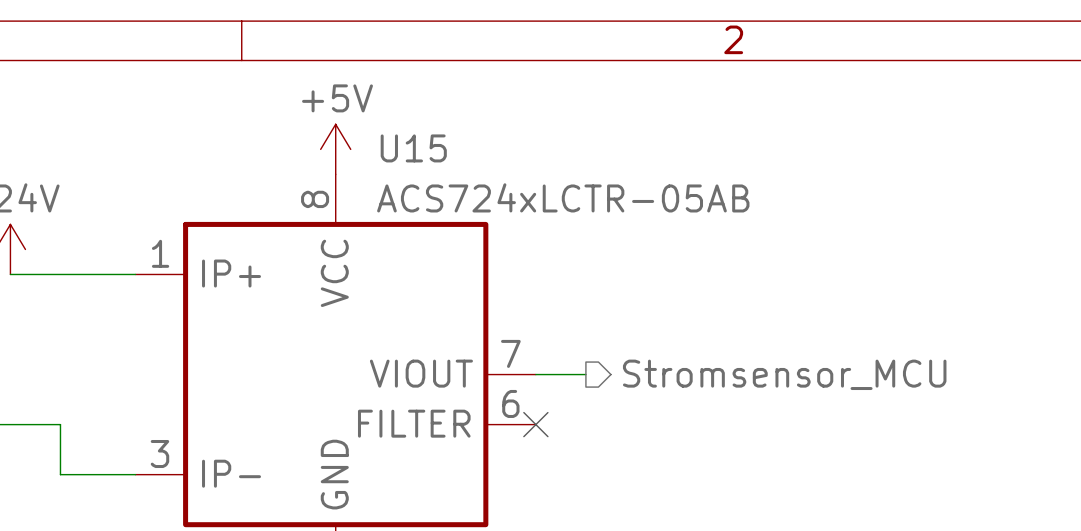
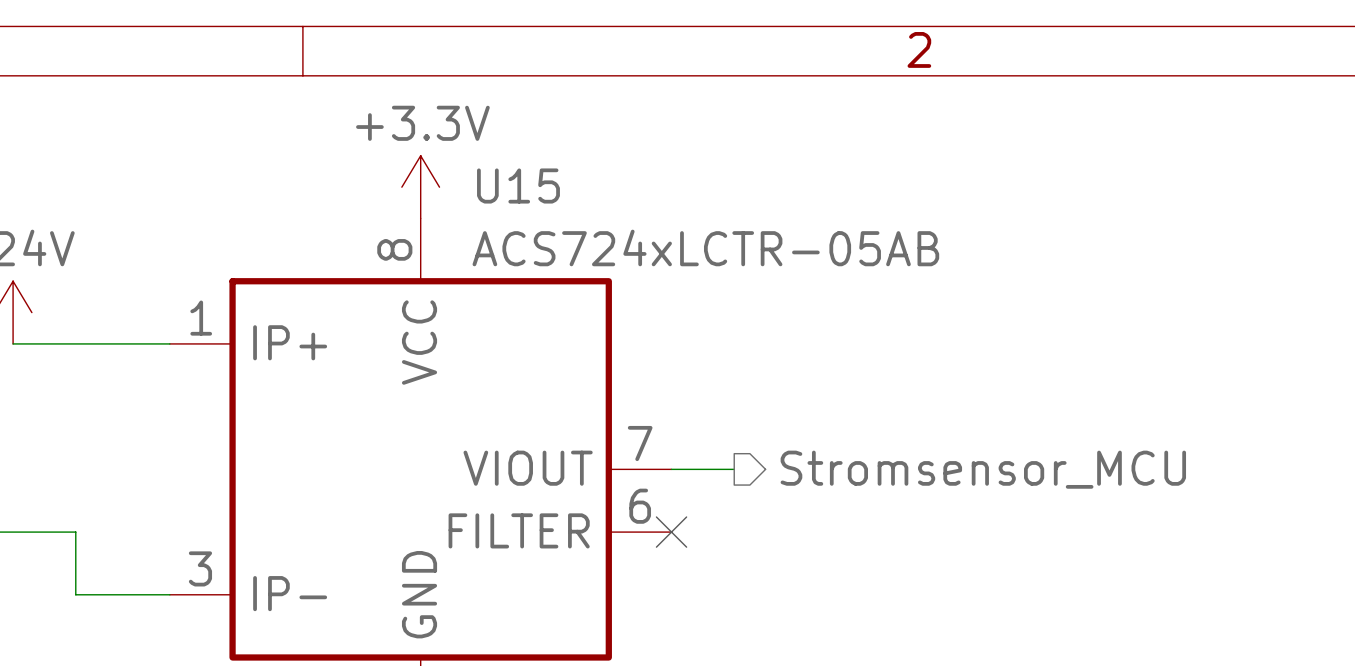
power symbol: +5V (335, 149) -> +3.3V (420, 187)

